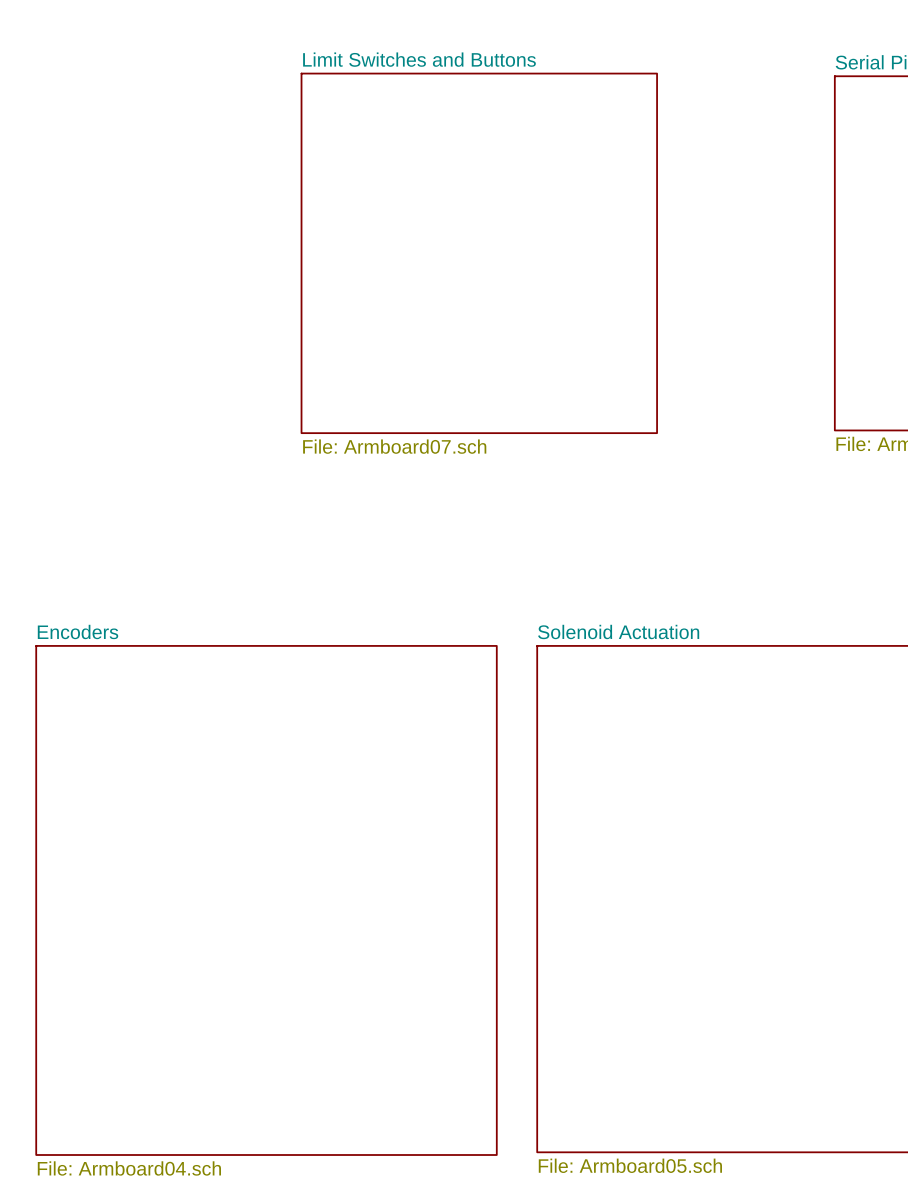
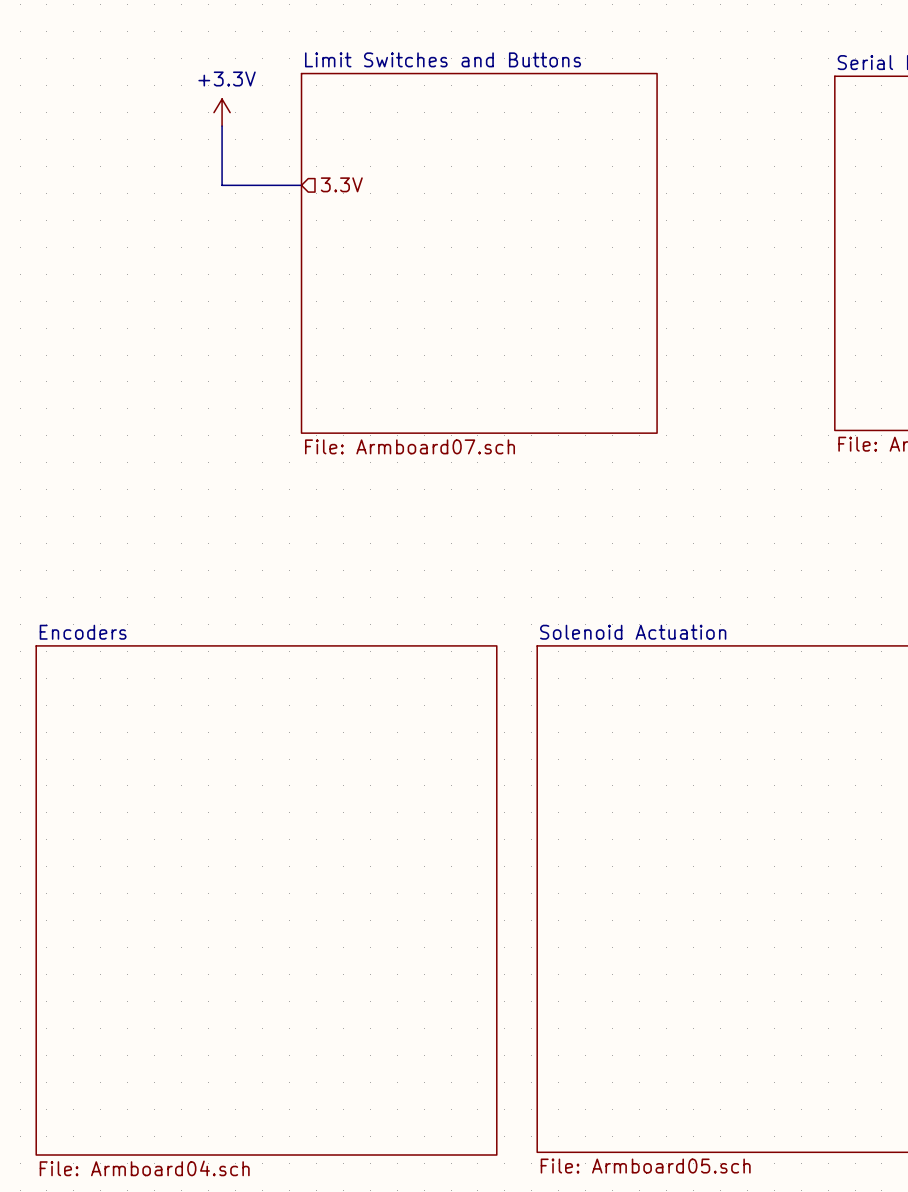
power symbol: none -> +3.3V (222, 112)
wire: none -> (222, 126) (222, 185) (301, 185)
hierarchical label: none -> 3.3V (341, 184)

